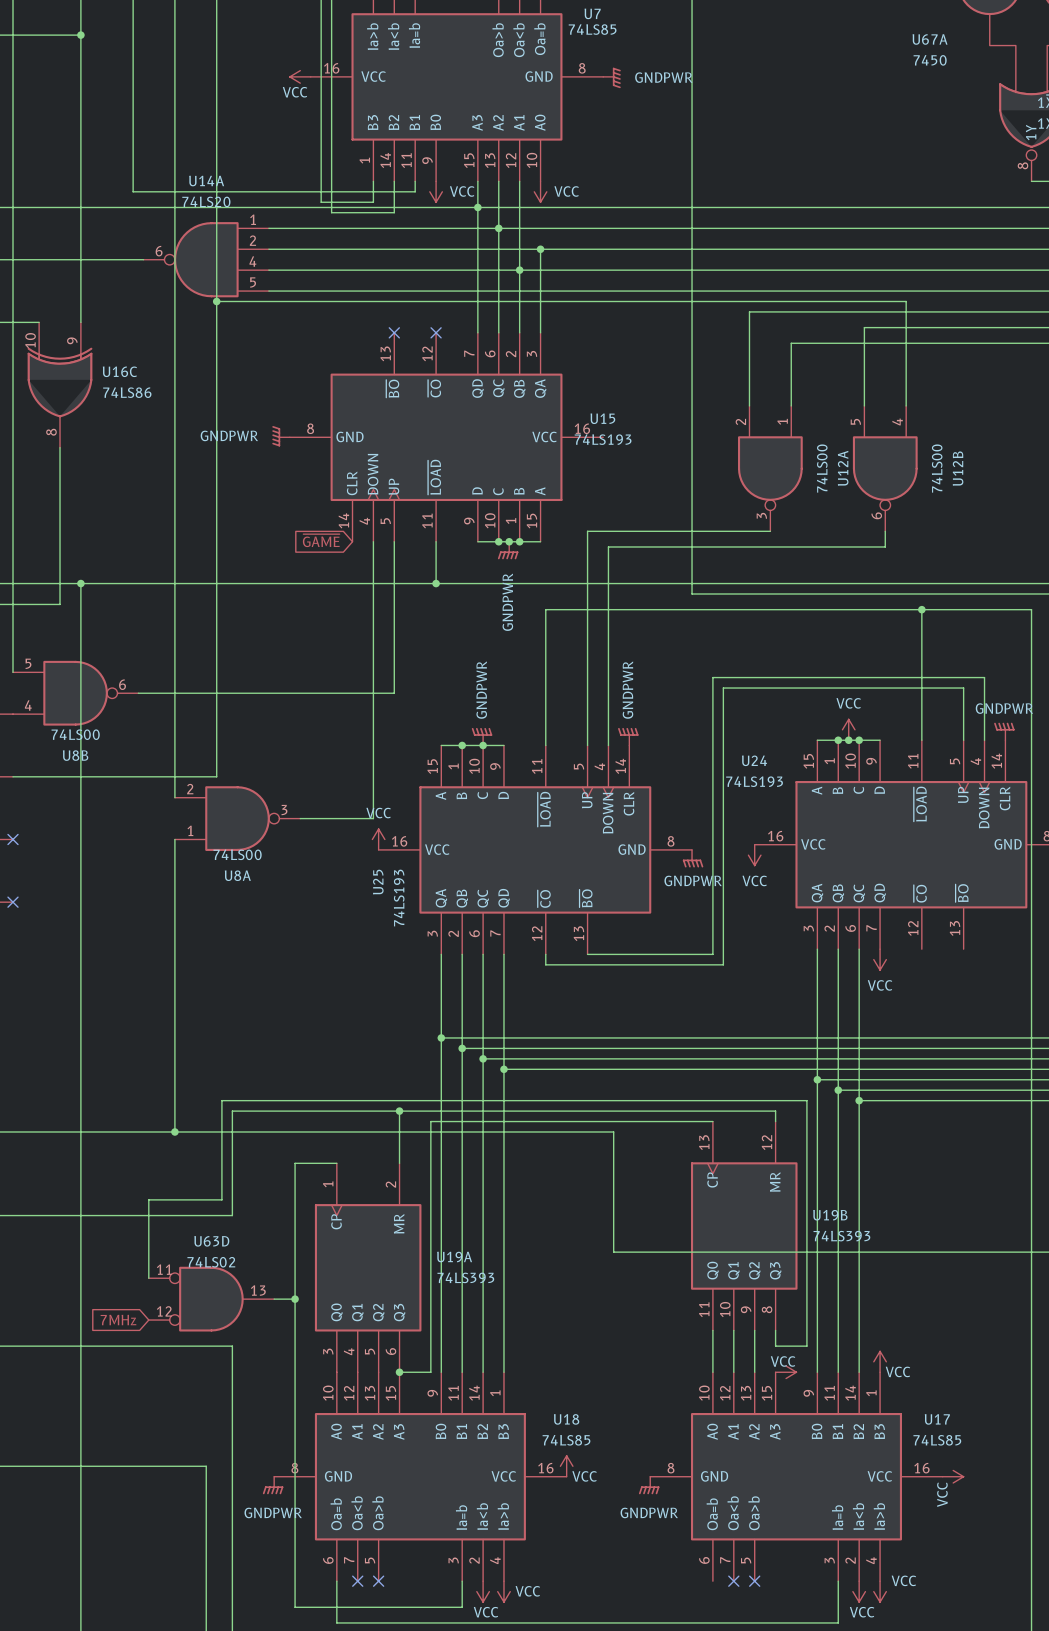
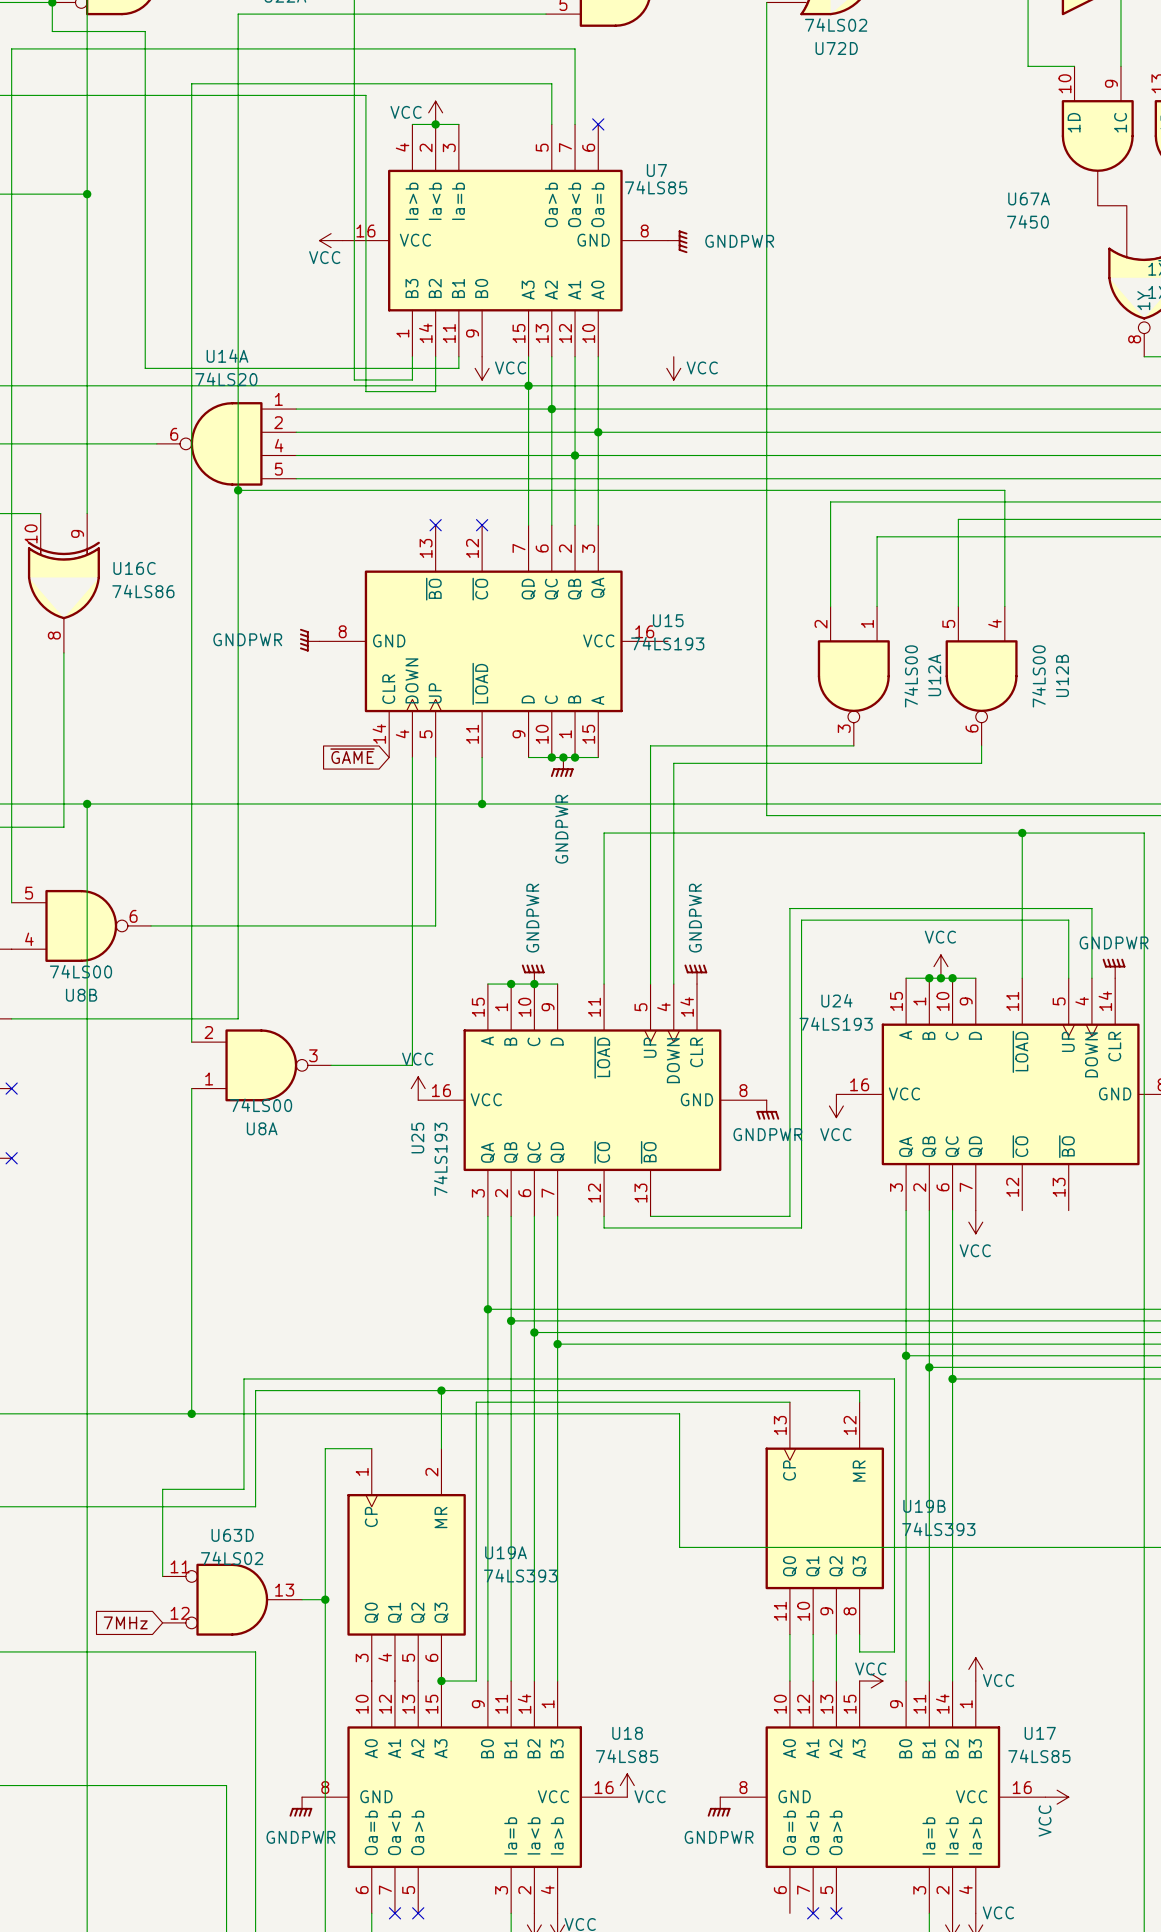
wire: none -> (598, 356) (598, 432)
power symbol position: VCC (540, 191) -> VCC (673, 368)

